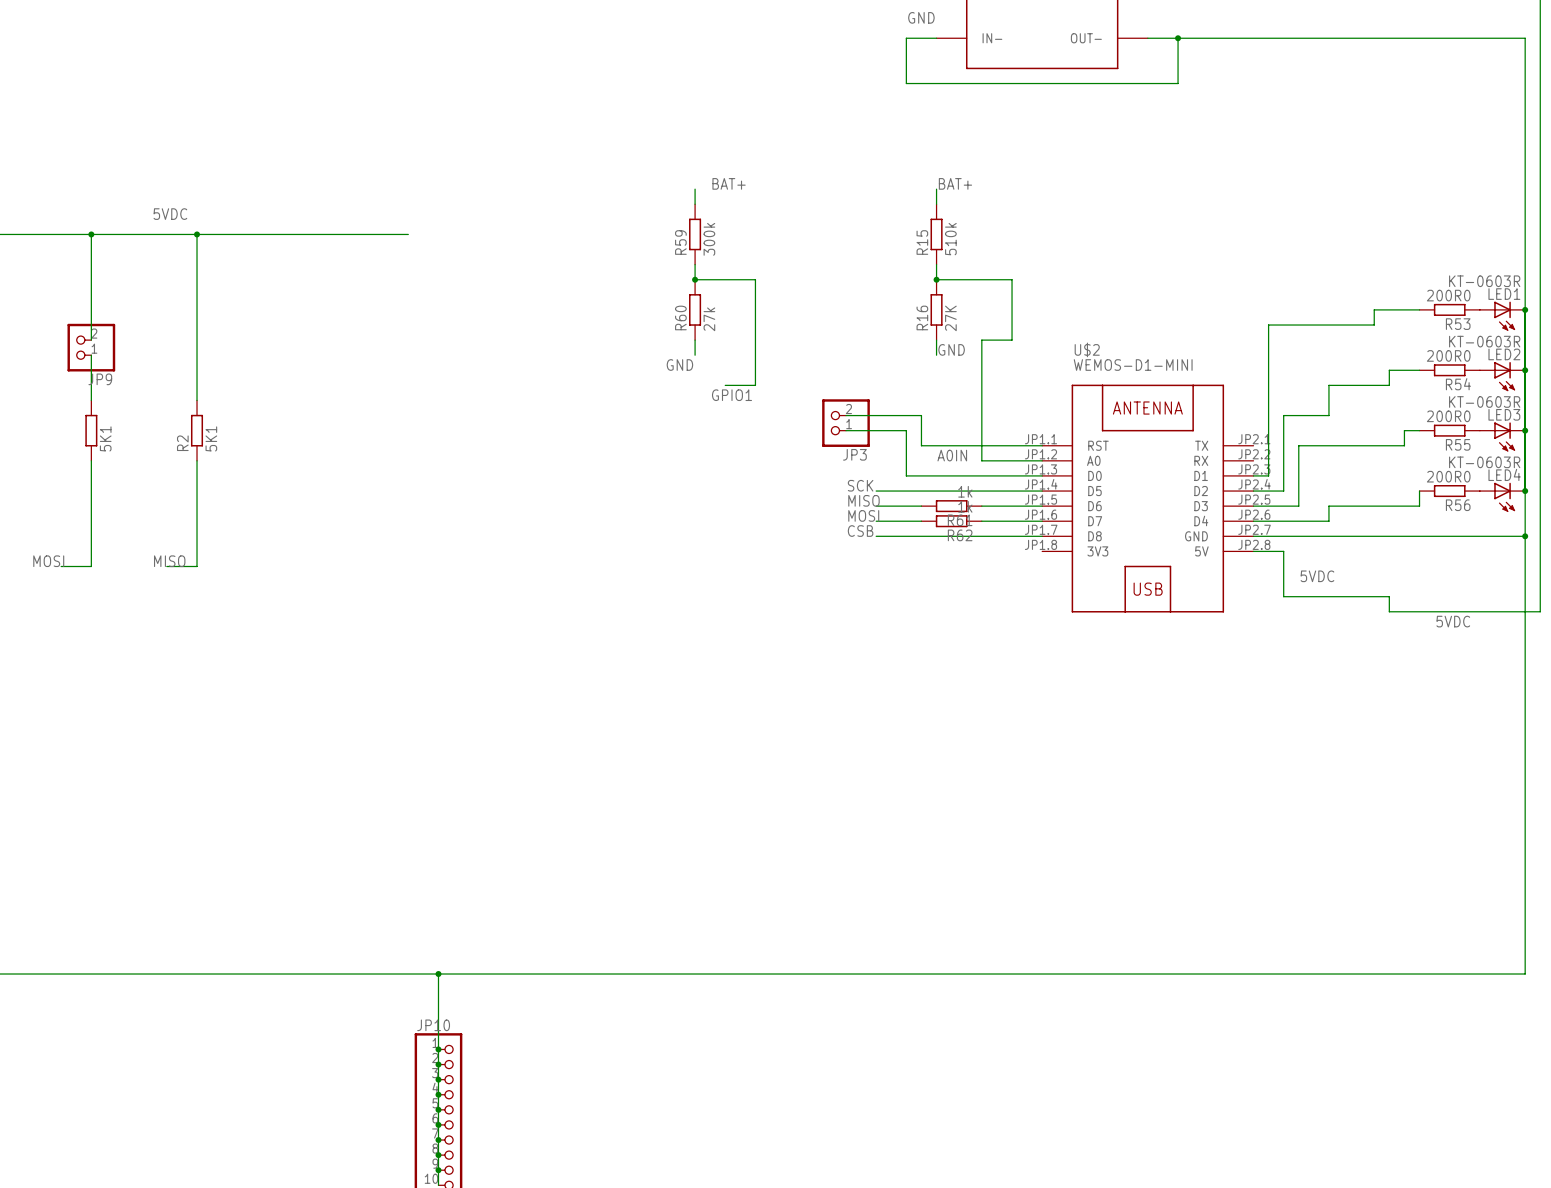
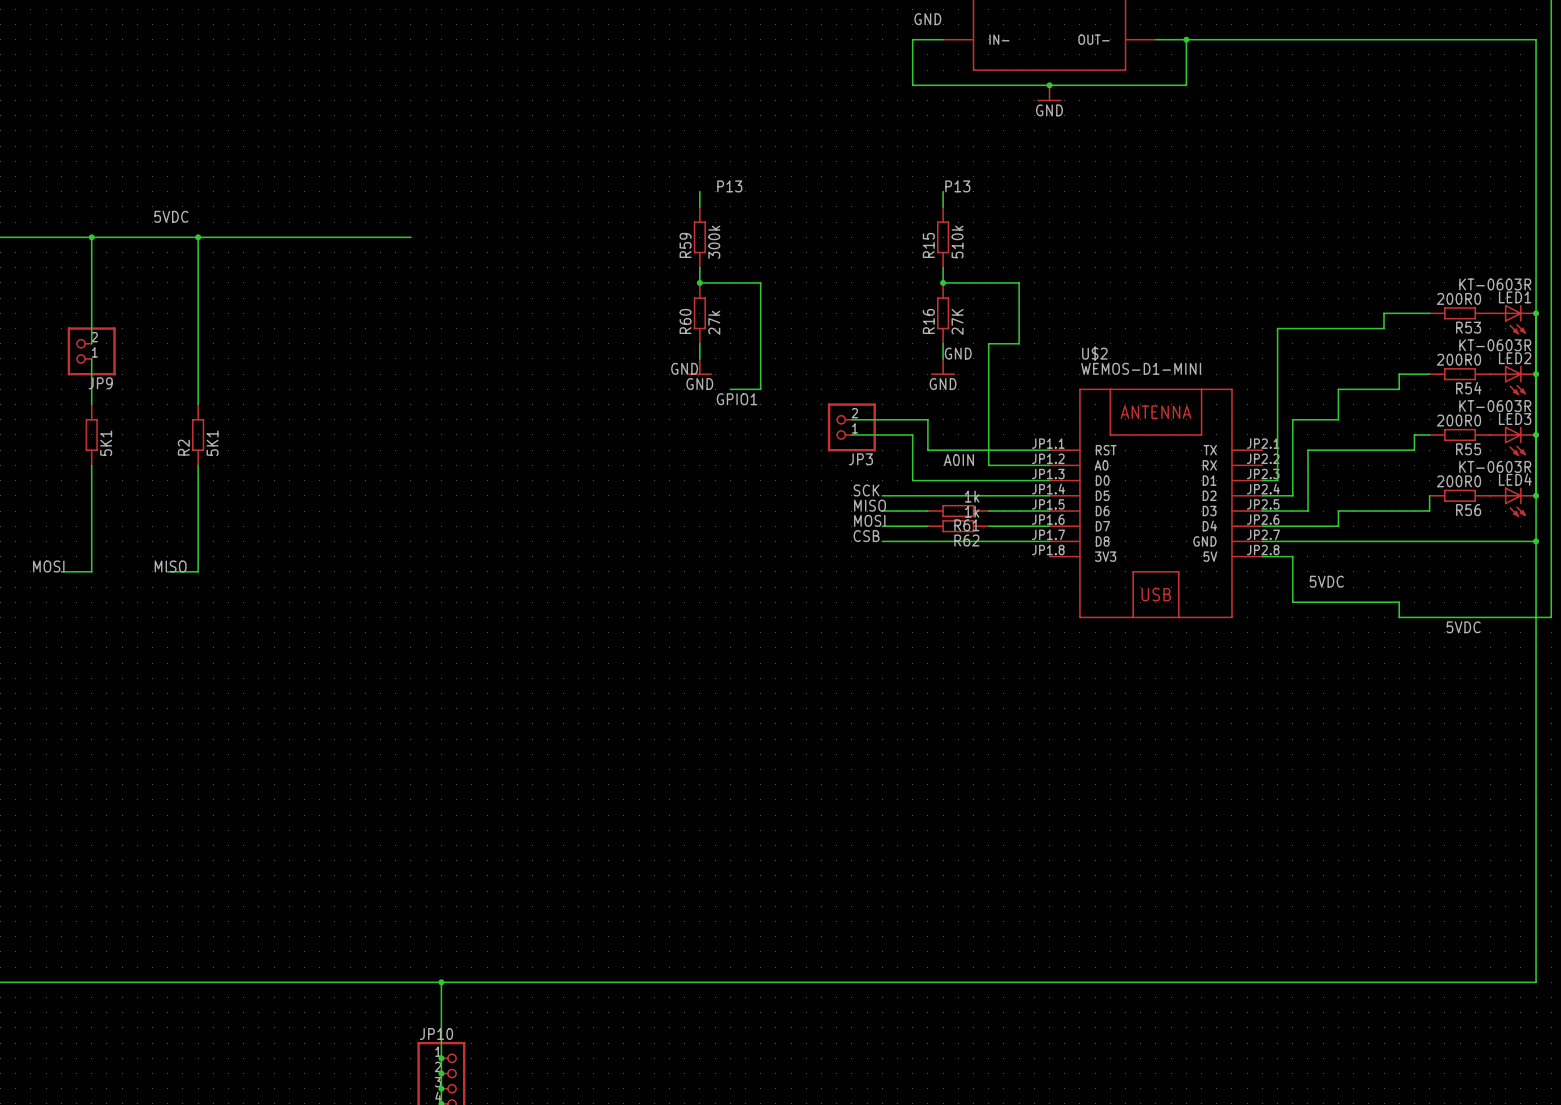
junction: none -> (1049, 85)
power symbol: none -> GND (1049, 93)
label: BAT+ (729, 183) -> P13 (729, 186)
label: BAT+ (955, 183) -> P13 (957, 186)
power symbol: none -> GND (699, 366)
power symbol: none -> GND (943, 366)

